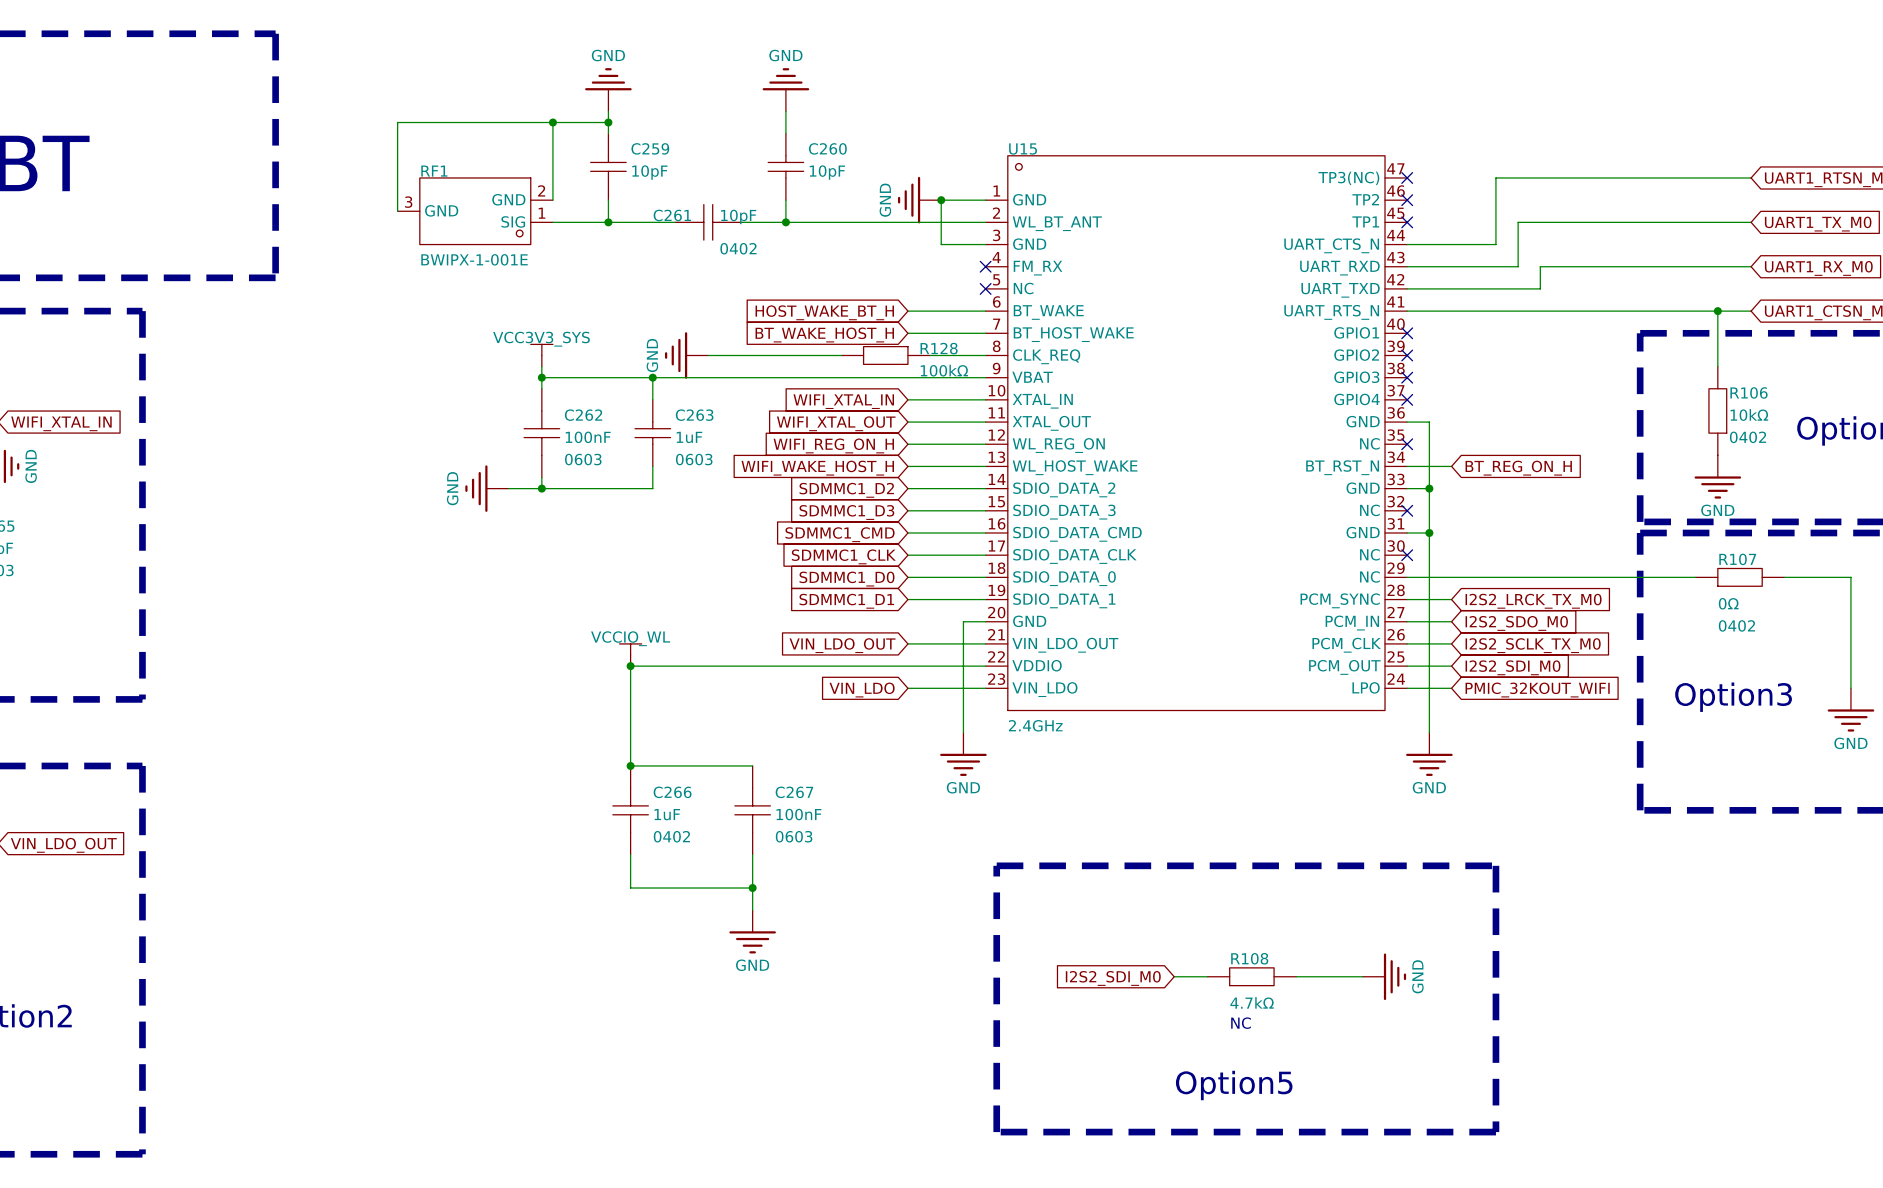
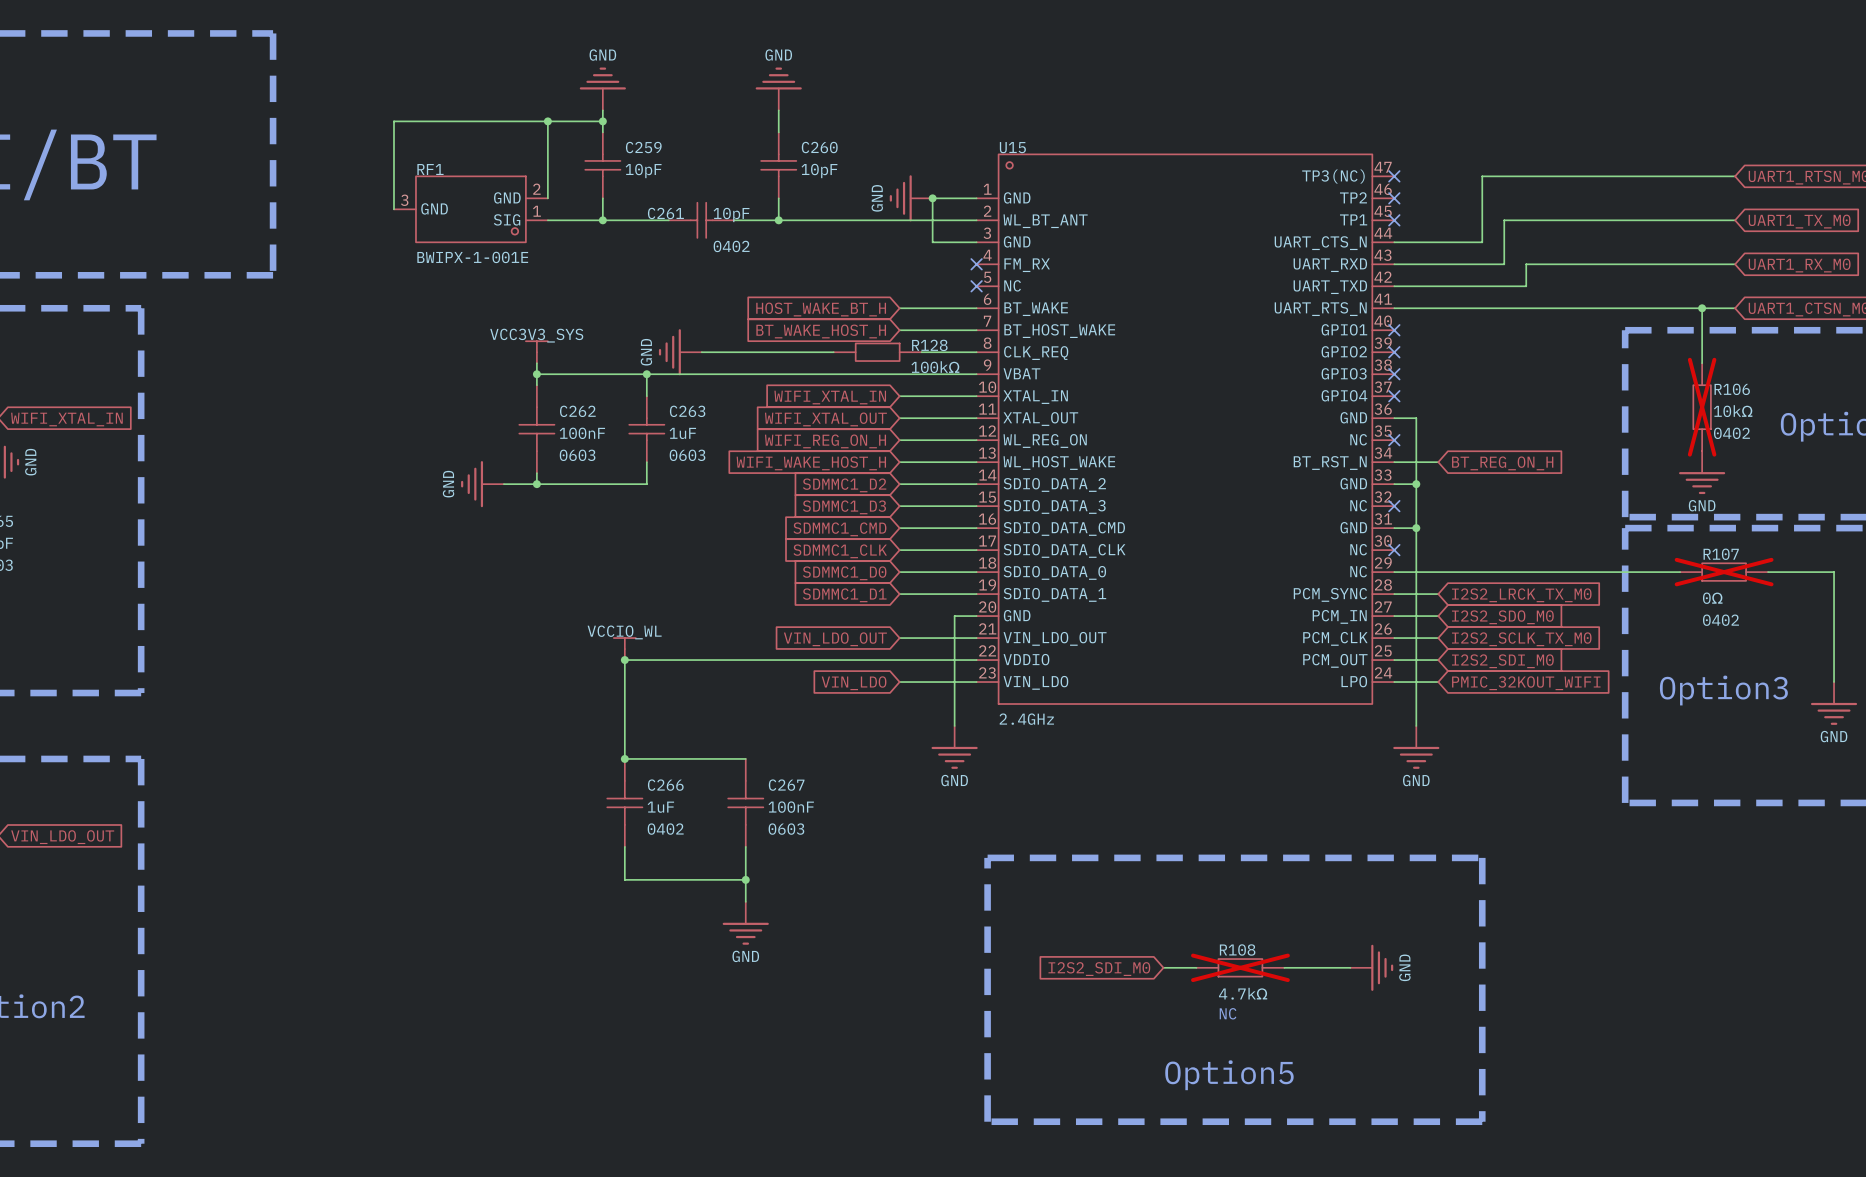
R106 do-not-place cross: none -> (1702, 407)
R107 do-not-place cross: none -> (1724, 572)
R108 do-not-place cross: none -> (1240, 967)

